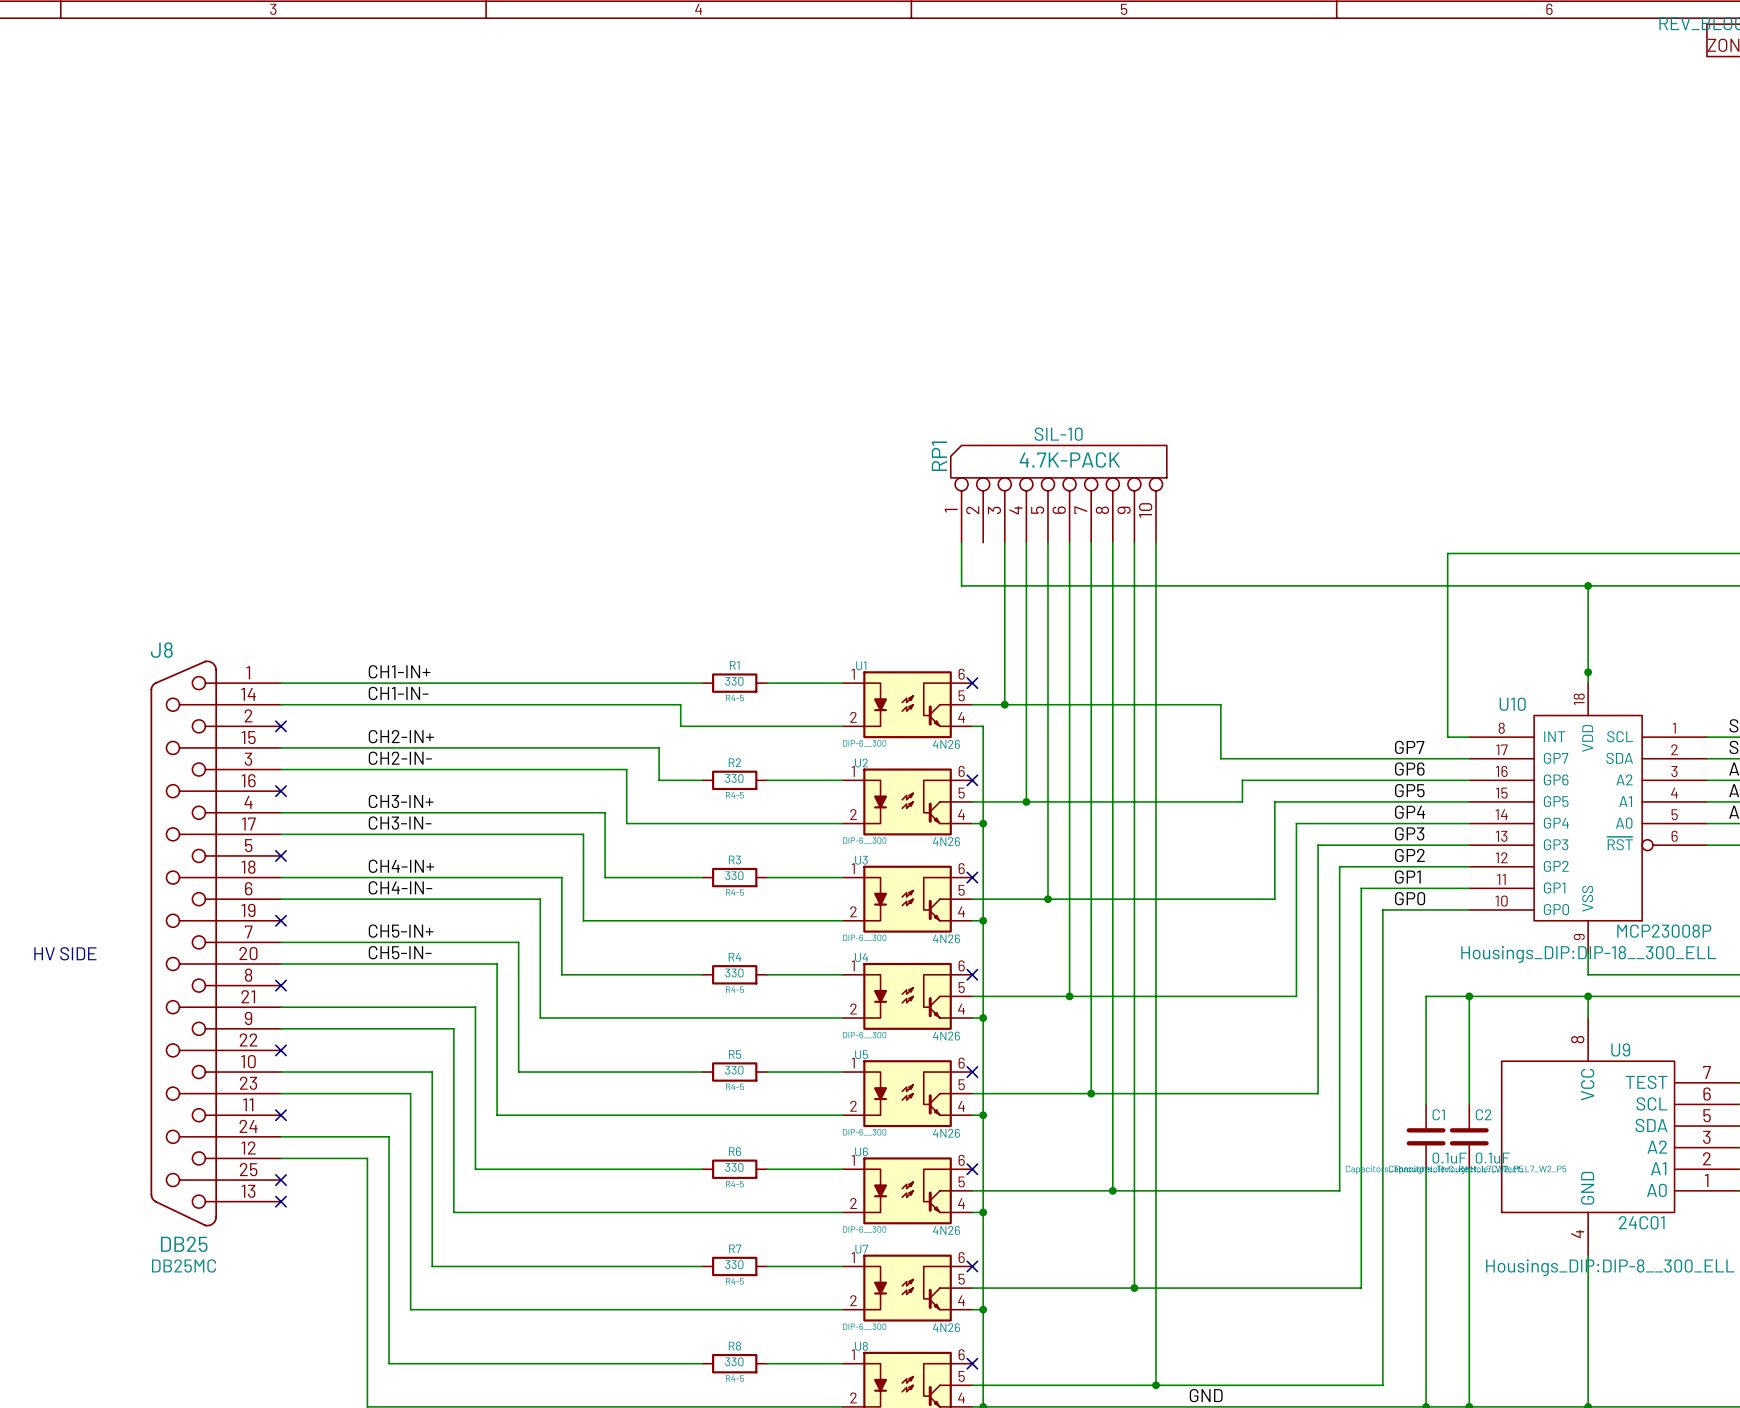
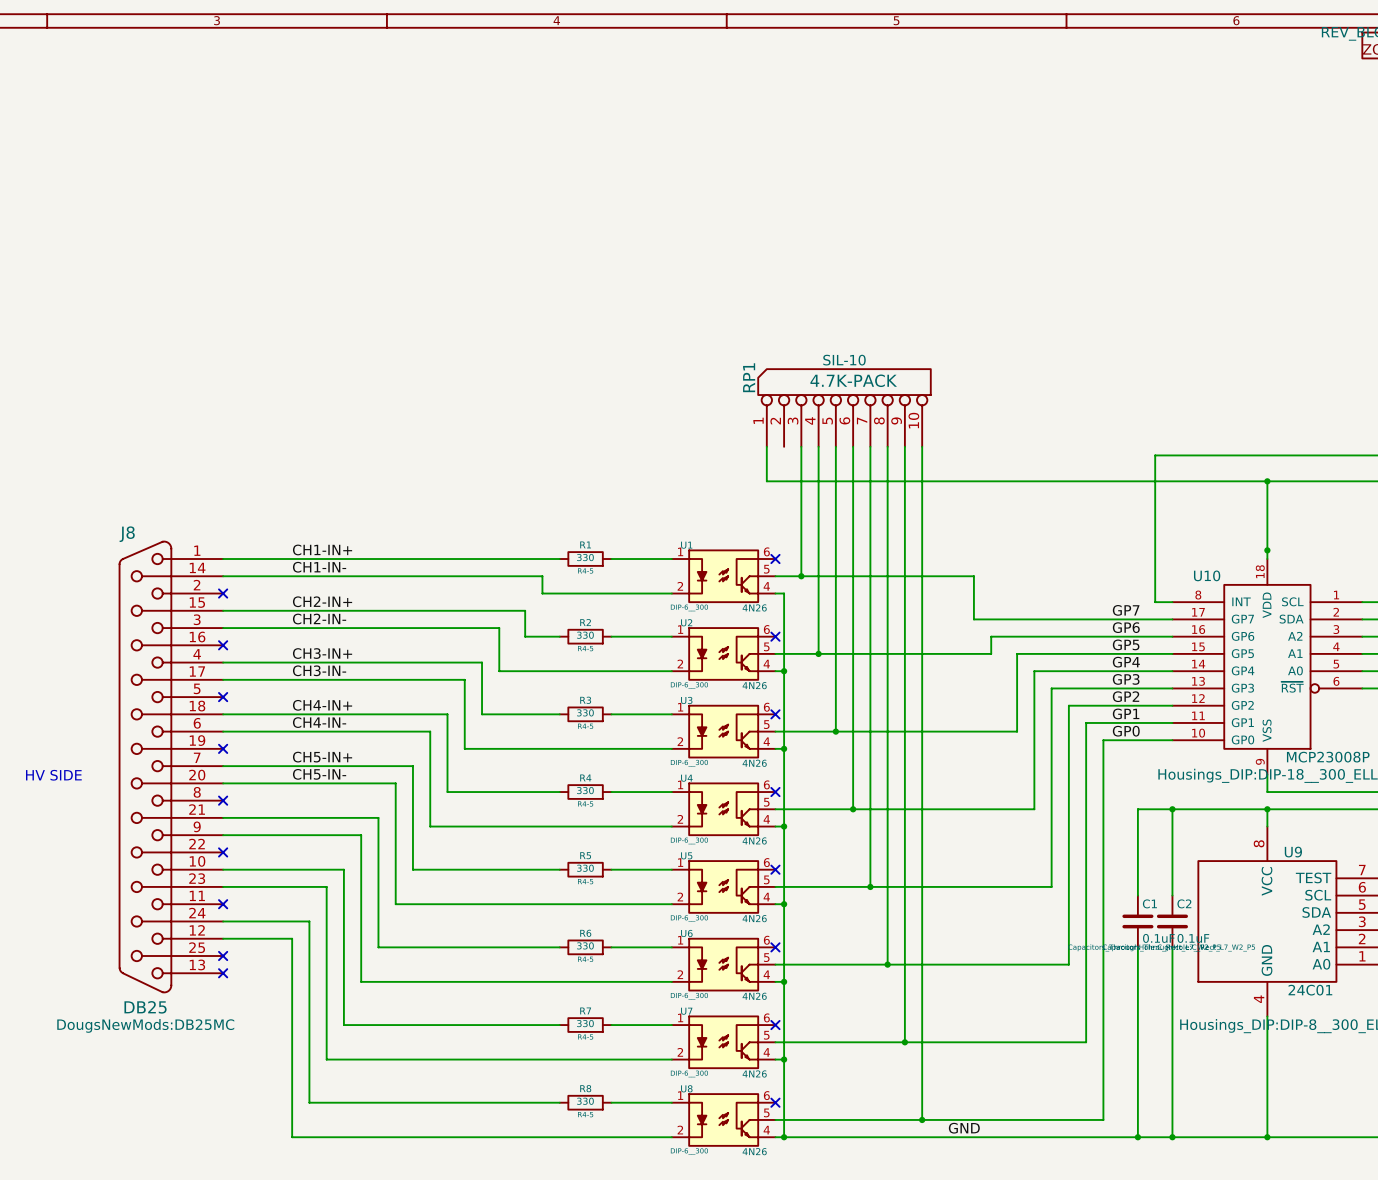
J8 text: DB25MC (184, 1265) -> DougsNewMods:DB25MC (145, 1025)

